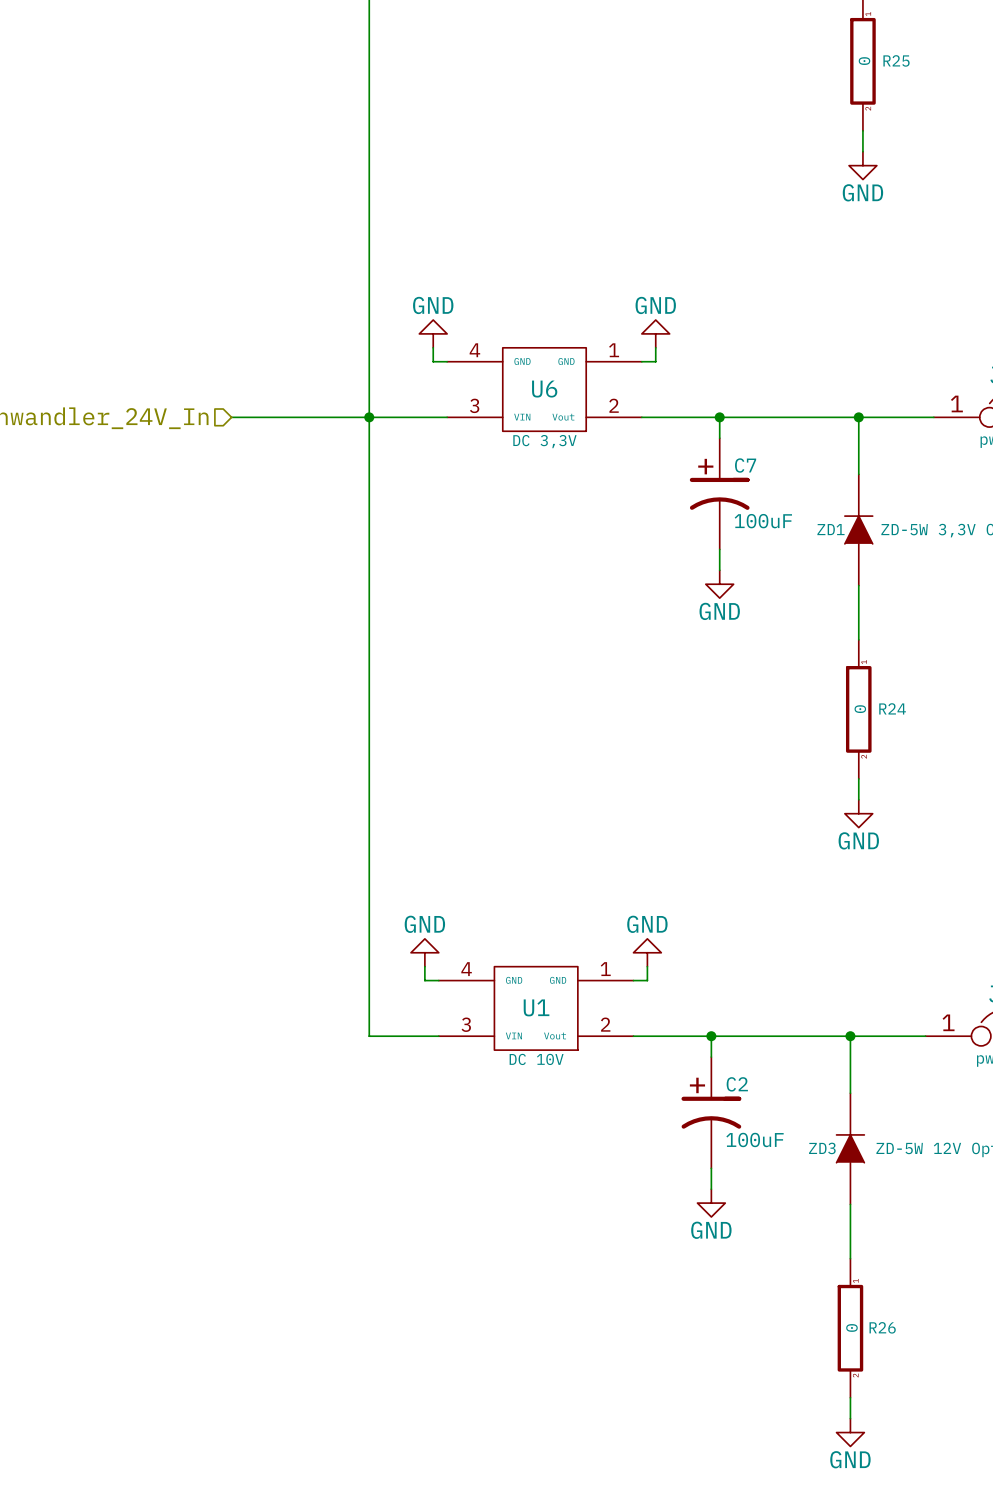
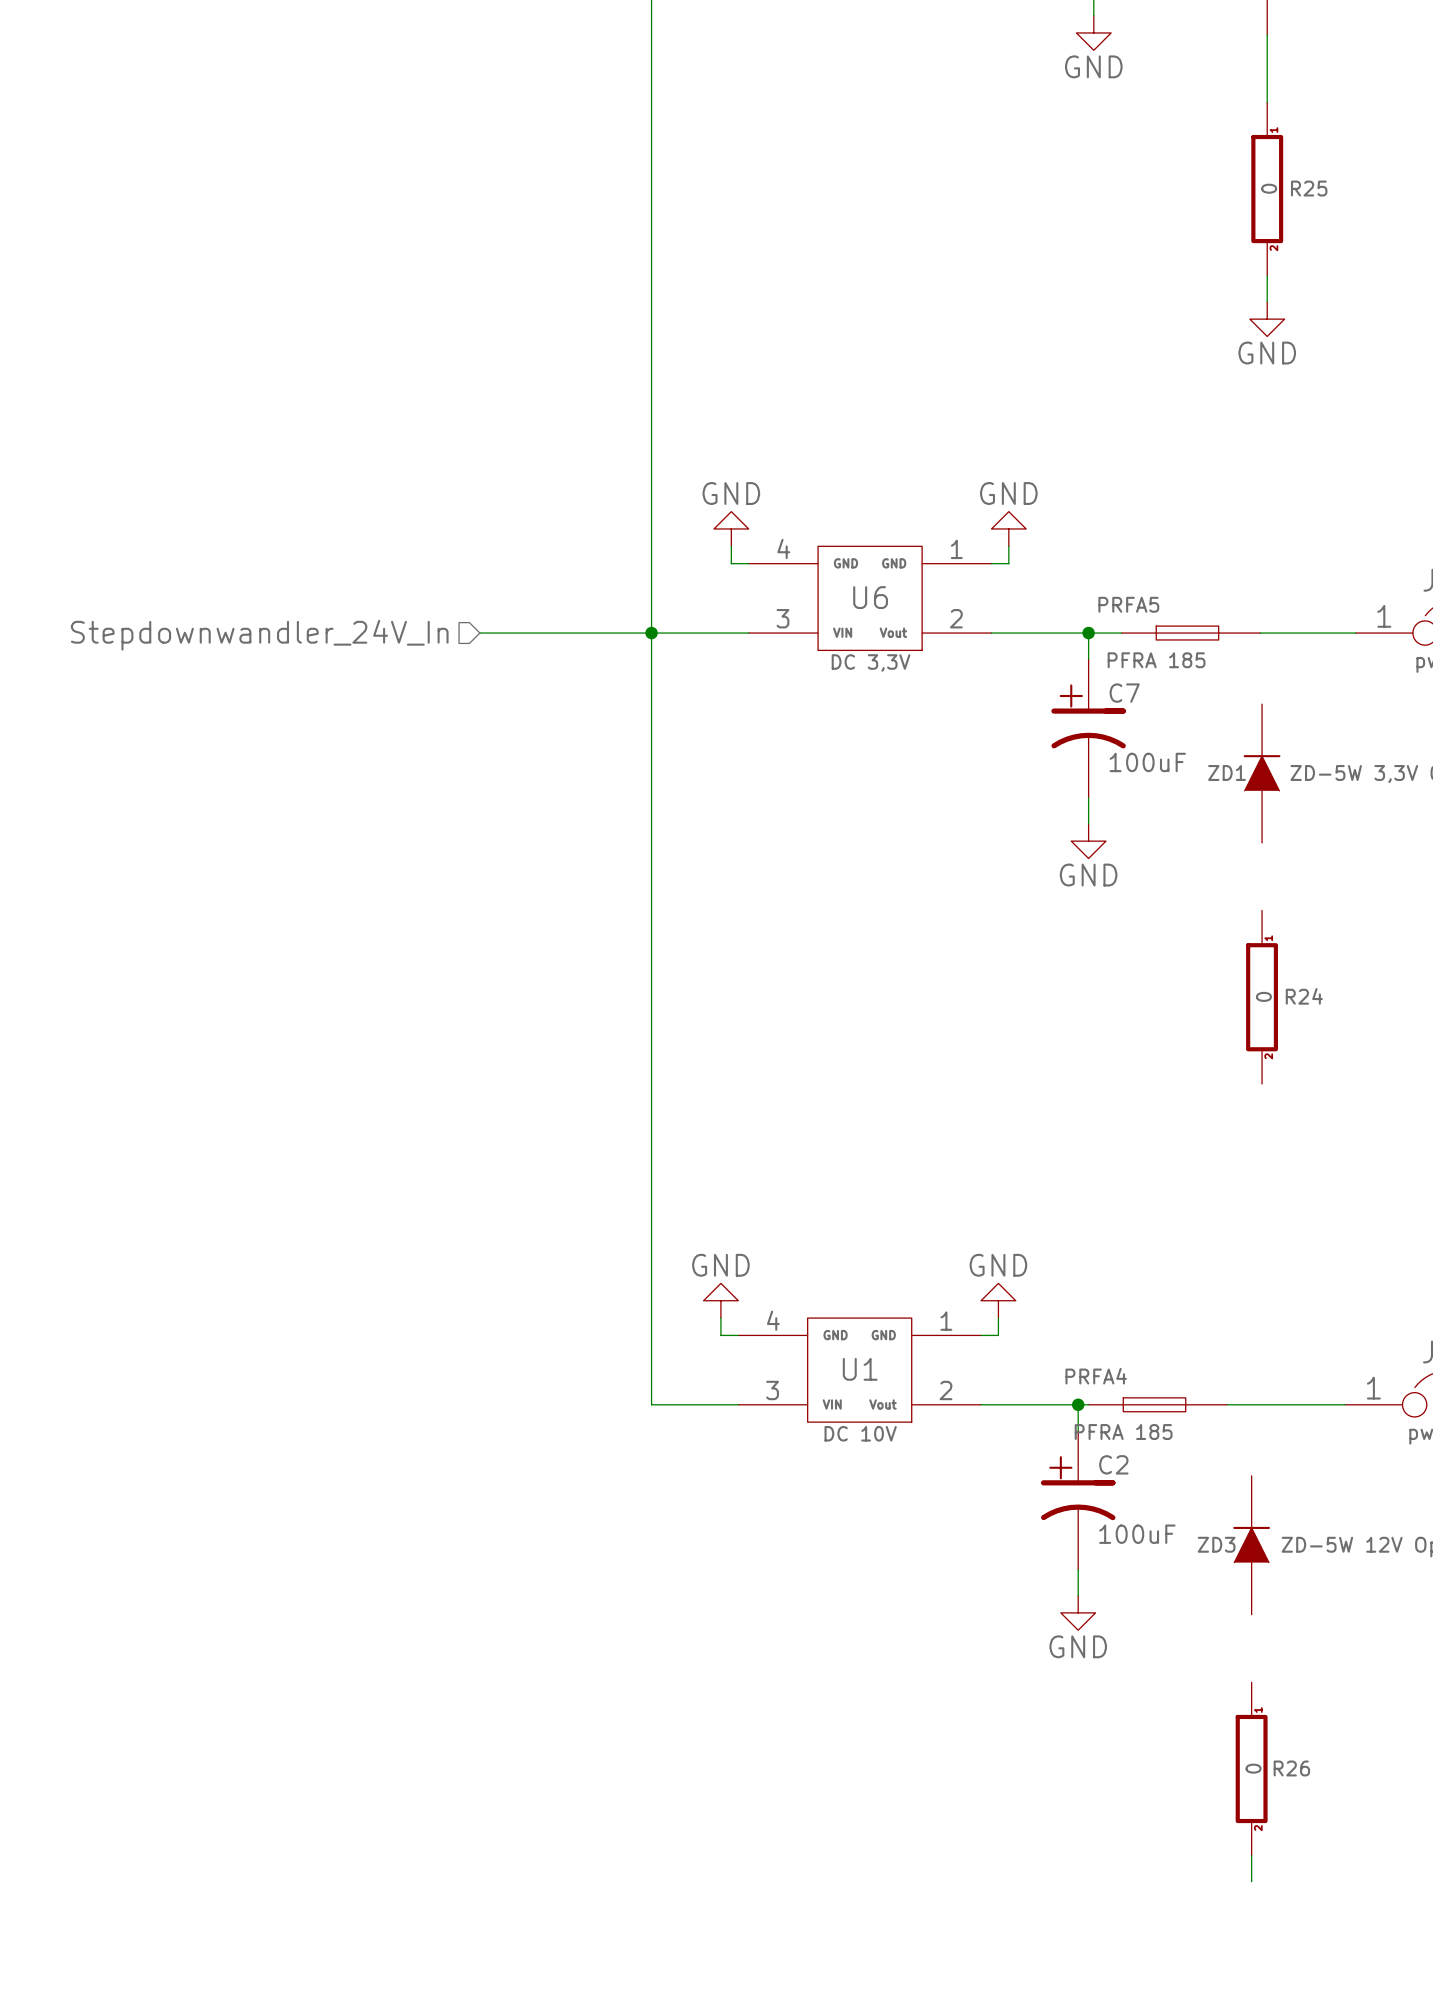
PRFA5: none -> PFRA 185 (1190, 633)
wire: (858, 417) (858, 474) -> none
junction: (858, 417) -> none
wire: (858, 585) (858, 639) -> none
wire: (858, 778) (858, 799) -> none
power symbol: GND (858, 813) -> none
PRFA4: none -> PFRA 185 (1157, 1404)
wire: (850, 1036) (850, 1093) -> none
junction: (850, 1036) -> none
wire: (850, 1204) (850, 1258) -> none
power symbol: GND (850, 1432) -> none

